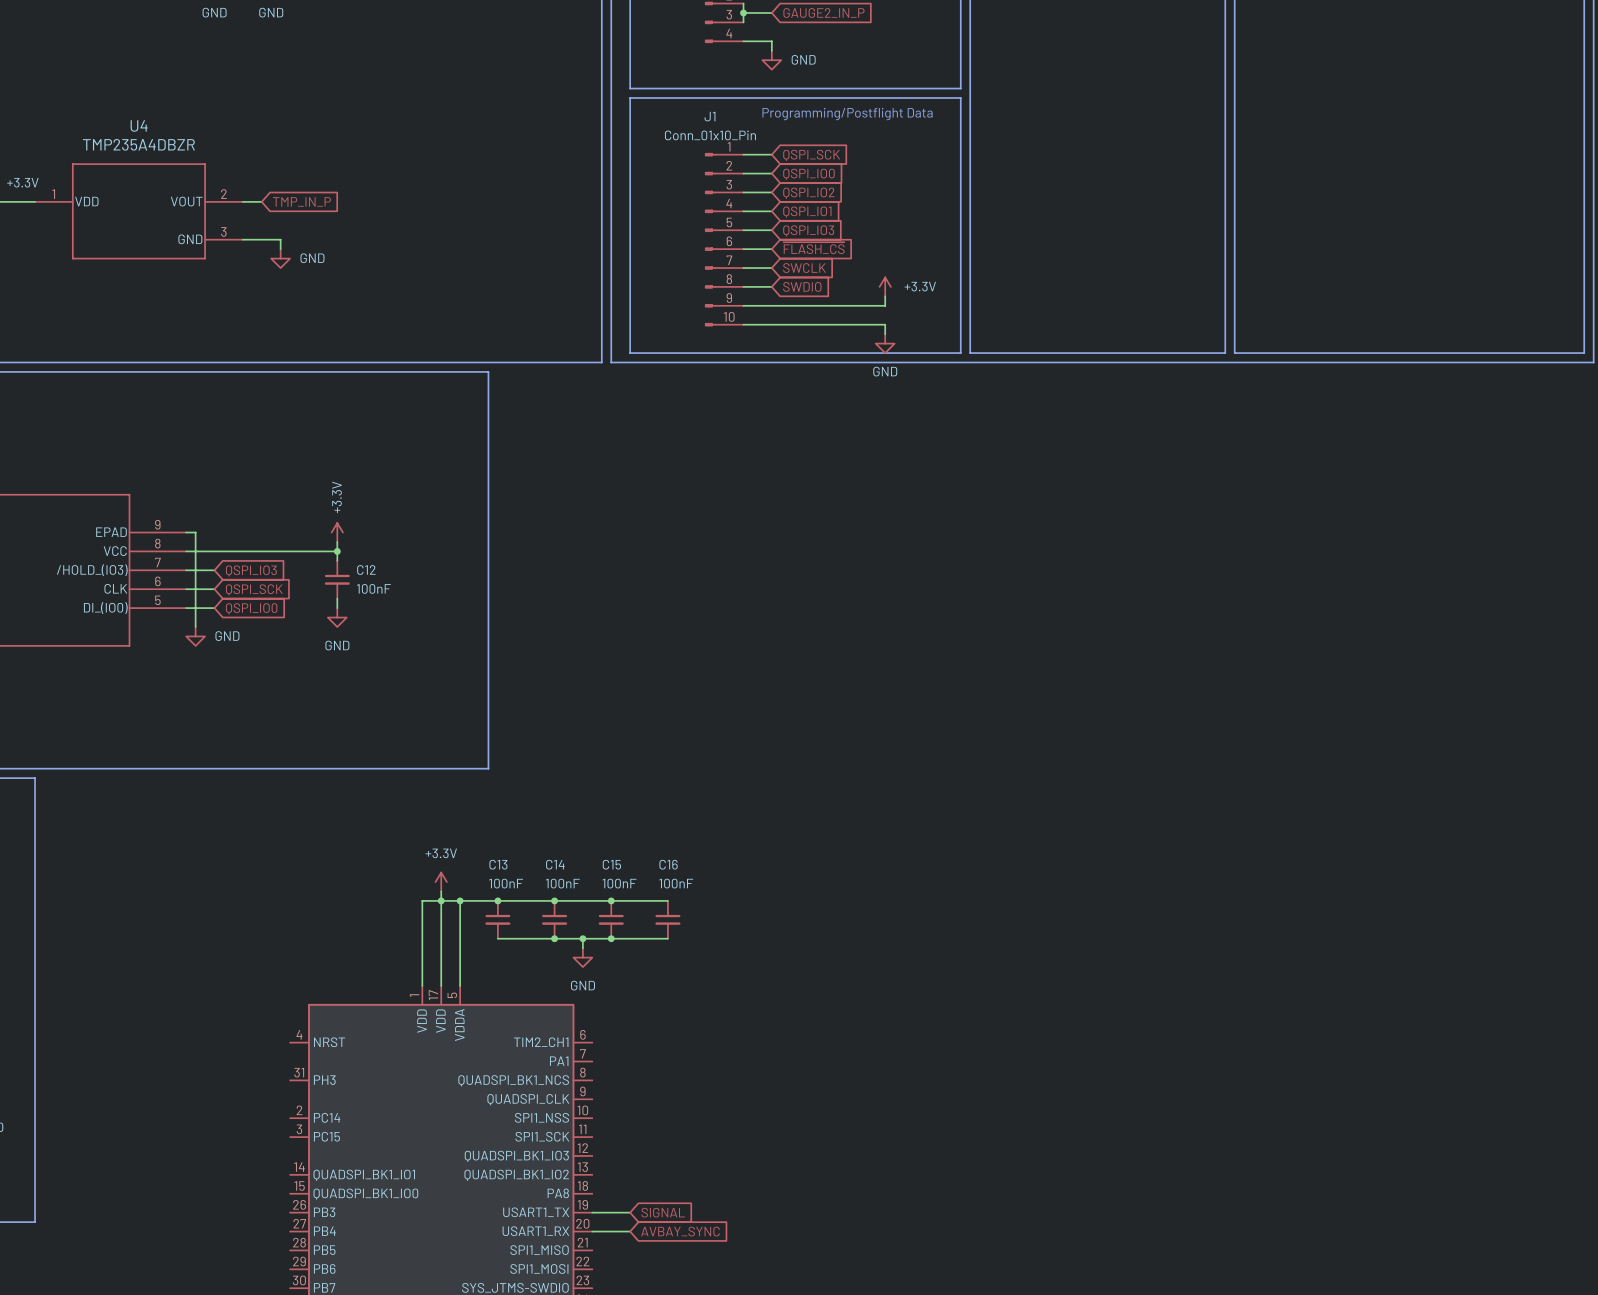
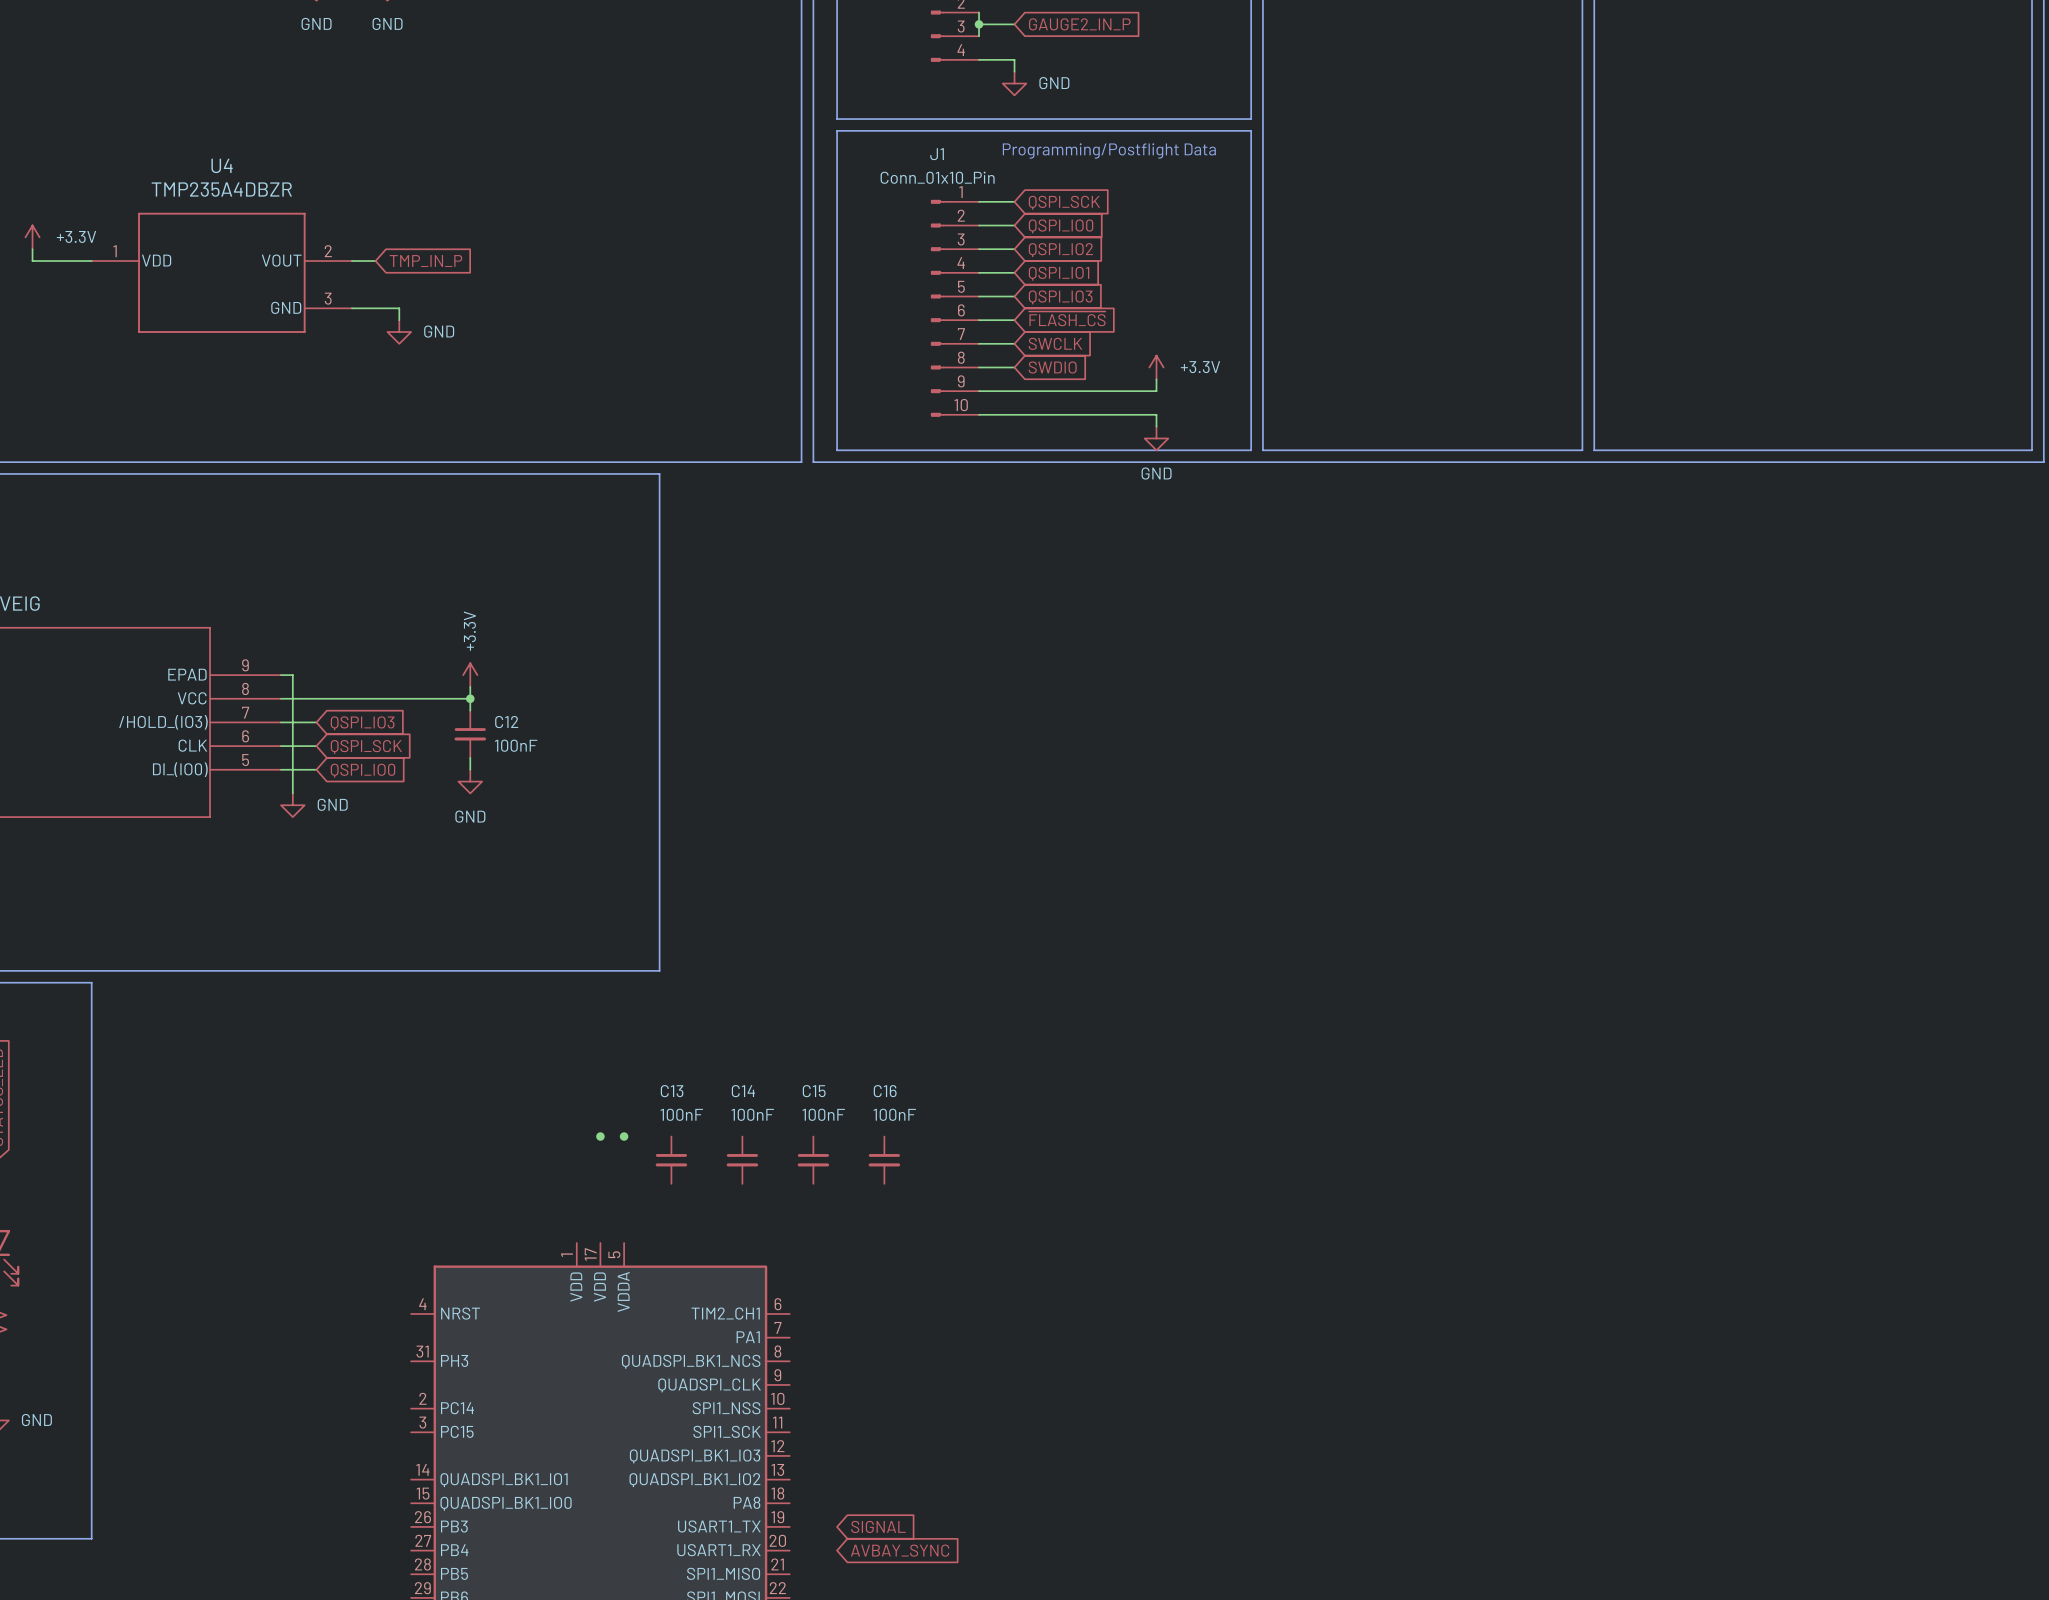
power symbol: +3.3V (441, 882) -> none
wire: (441, 891) (441, 985) -> none
wire: (460, 900) (460, 985) -> none
junction: (497, 900) -> none
junction: (554, 900) -> none
junction: (611, 900) -> none
wire: (667, 900) (422, 900) (422, 985) -> none
wire: (497, 938) (667, 938) -> none
junction: (554, 938) -> none
wire: (582, 938) (582, 948) -> none
junction: (582, 938) -> none
junction: (611, 938) -> none
power symbol: GND (582, 957) -> none
wire: (592, 1212) (630, 1212) -> none
wire: (592, 1231) (630, 1231) -> none

